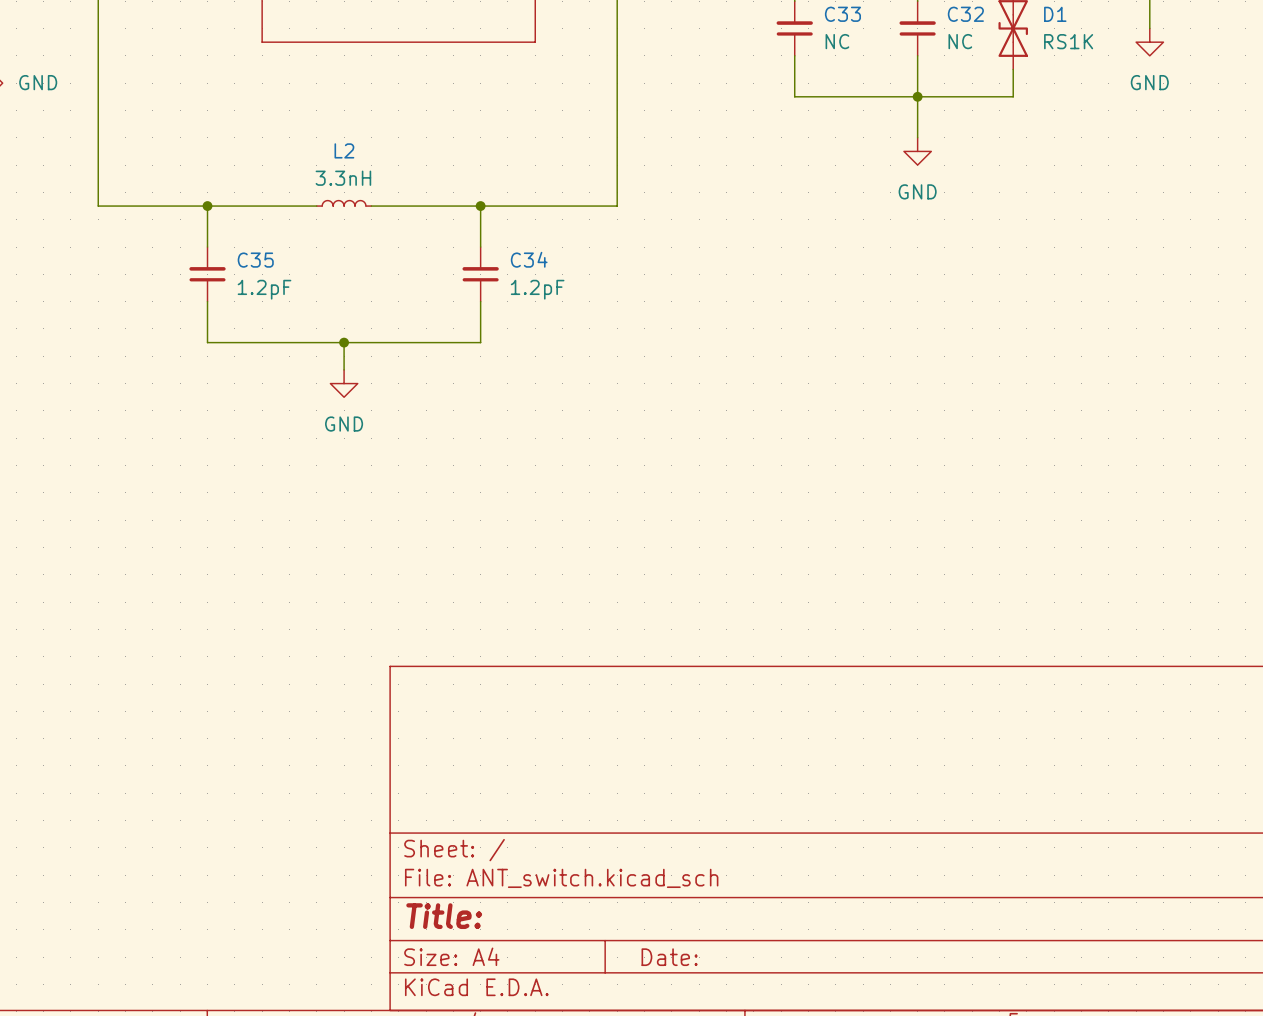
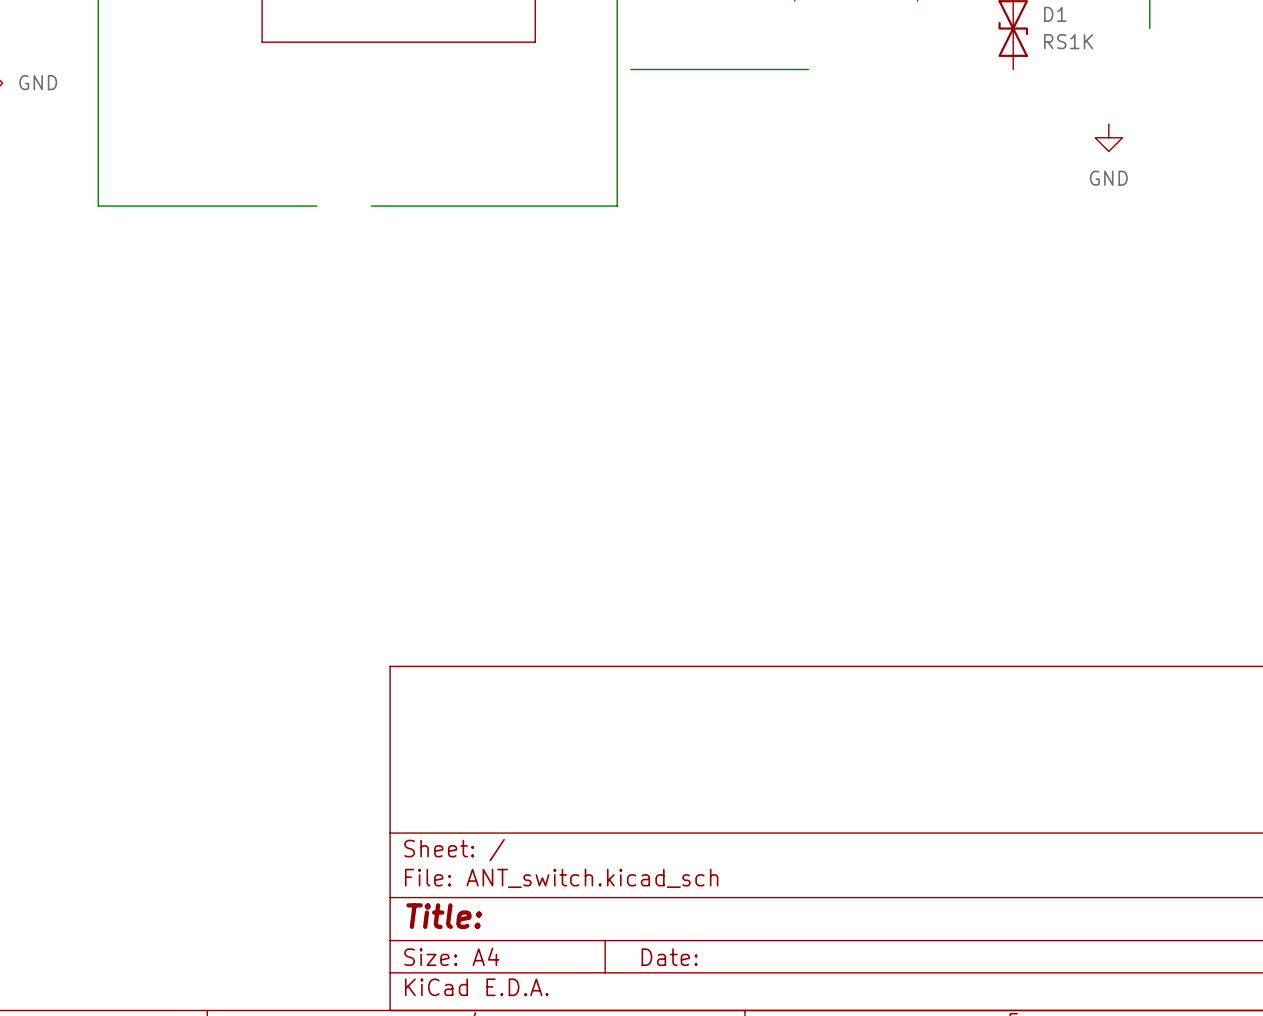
C33: NC (794, 28) -> none
C32: NC (917, 28) -> none
power symbol: GND (1149, 42) -> none
wire: (794, 55) (794, 96) (1013, 96) (1013, 69) -> none
wire: (917, 55) (917, 137) -> none
wire: none -> (630, 69) (808, 69)
junction: (917, 96) -> none
power symbol: none -> GND (1108, 137)
power symbol: GND (917, 151) -> none
L2: 3.3nH (344, 203) -> none
wire: (207, 206) (207, 247) -> none
junction: (207, 206) -> none
wire: (480, 206) (480, 247) -> none
junction: (480, 206) -> none
C35: 1.2pF (207, 274) -> none
C34: 1.2pF (480, 274) -> none
wire: (207, 301) (207, 342) (480, 342) (480, 301) -> none
wire: (344, 342) (344, 369) -> none
junction: (344, 342) -> none
power symbol: GND (344, 383) -> none

